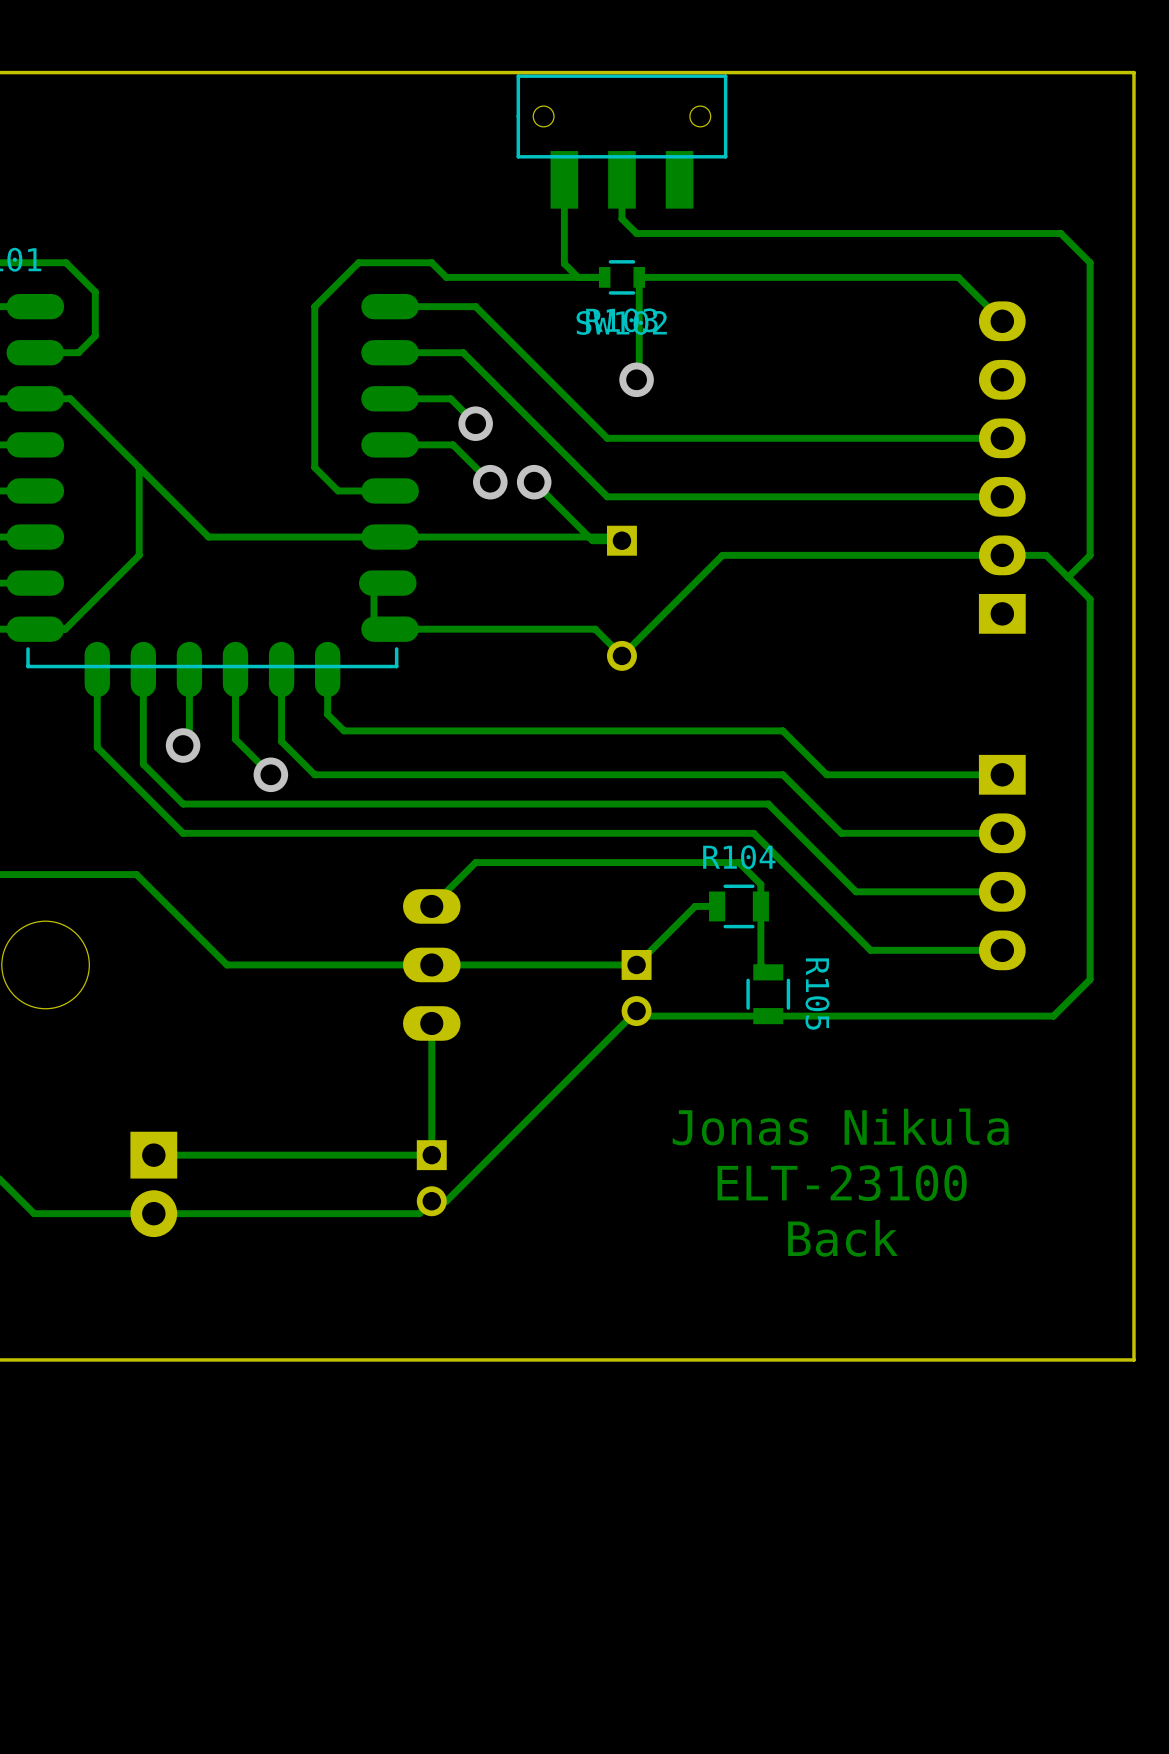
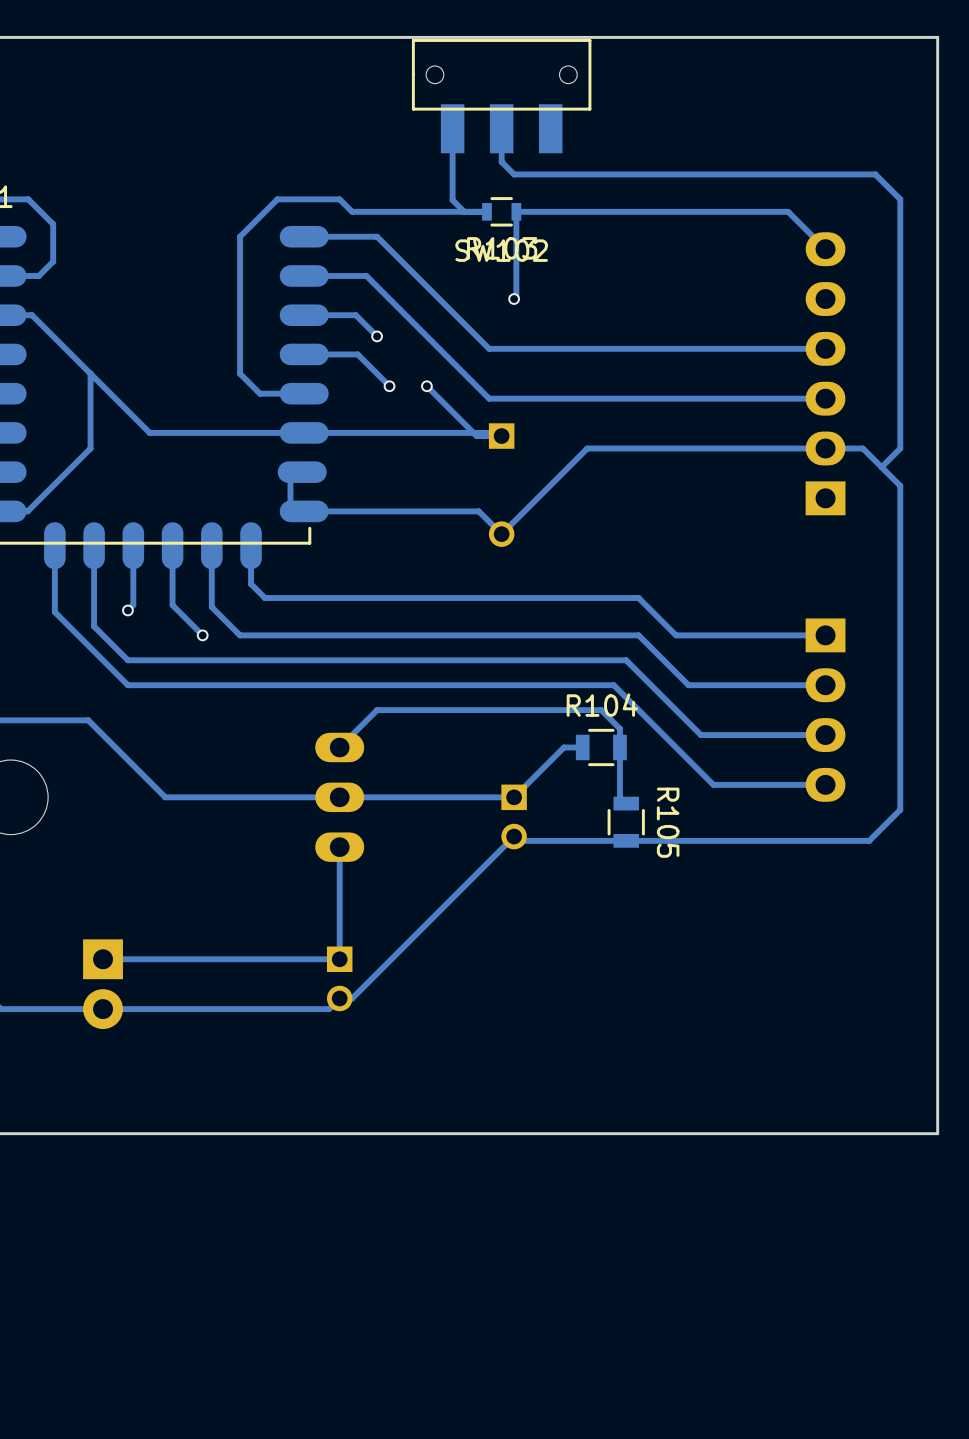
via size: [619, 362, 654, 398] -> [508, 293, 521, 305]
via size: [458, 406, 493, 441] -> [371, 330, 383, 343]
via size: [473, 464, 508, 500] -> [383, 380, 396, 393]
via size: [516, 464, 552, 500] -> [421, 380, 433, 393]
via size: [165, 728, 201, 763] -> [122, 604, 134, 617]
via size: [253, 757, 289, 793] -> [196, 629, 209, 642]
text: Jonas Nikula (840, 1126) -> none
text: ELT-23100 (842, 1183) -> none
text: Back (842, 1238) -> none

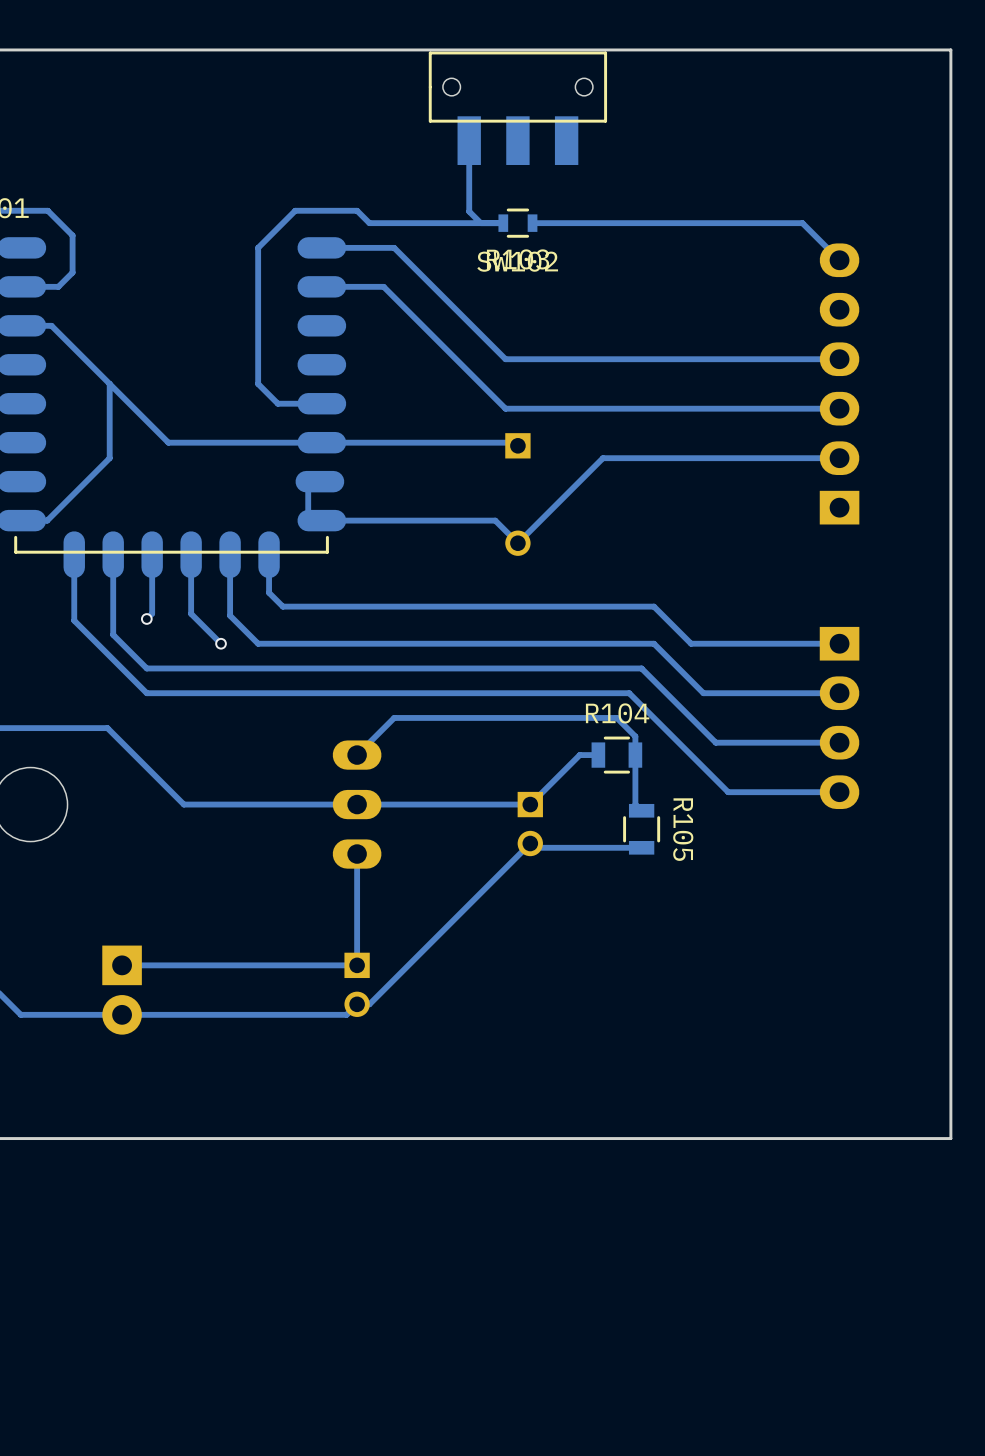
track: (501, 153) (501, 161) (514, 174) (875, 174) (900, 199) (900, 448) (881, 467) -> none
track: (516, 211) (516, 296) (514, 299) -> none
via: (514, 299) -> none
track: (290, 315) (355, 315) (377, 336) -> none
via: (377, 336) -> none
track: (290, 354) (357, 354) (389, 386) -> none
via: (389, 386) -> none
track: (426, 386) (476, 436) (501, 436) -> none
via: (426, 386) -> none
track: (825, 448) (862, 448) (900, 485) (900, 809) (869, 840) (626, 840) -> none

